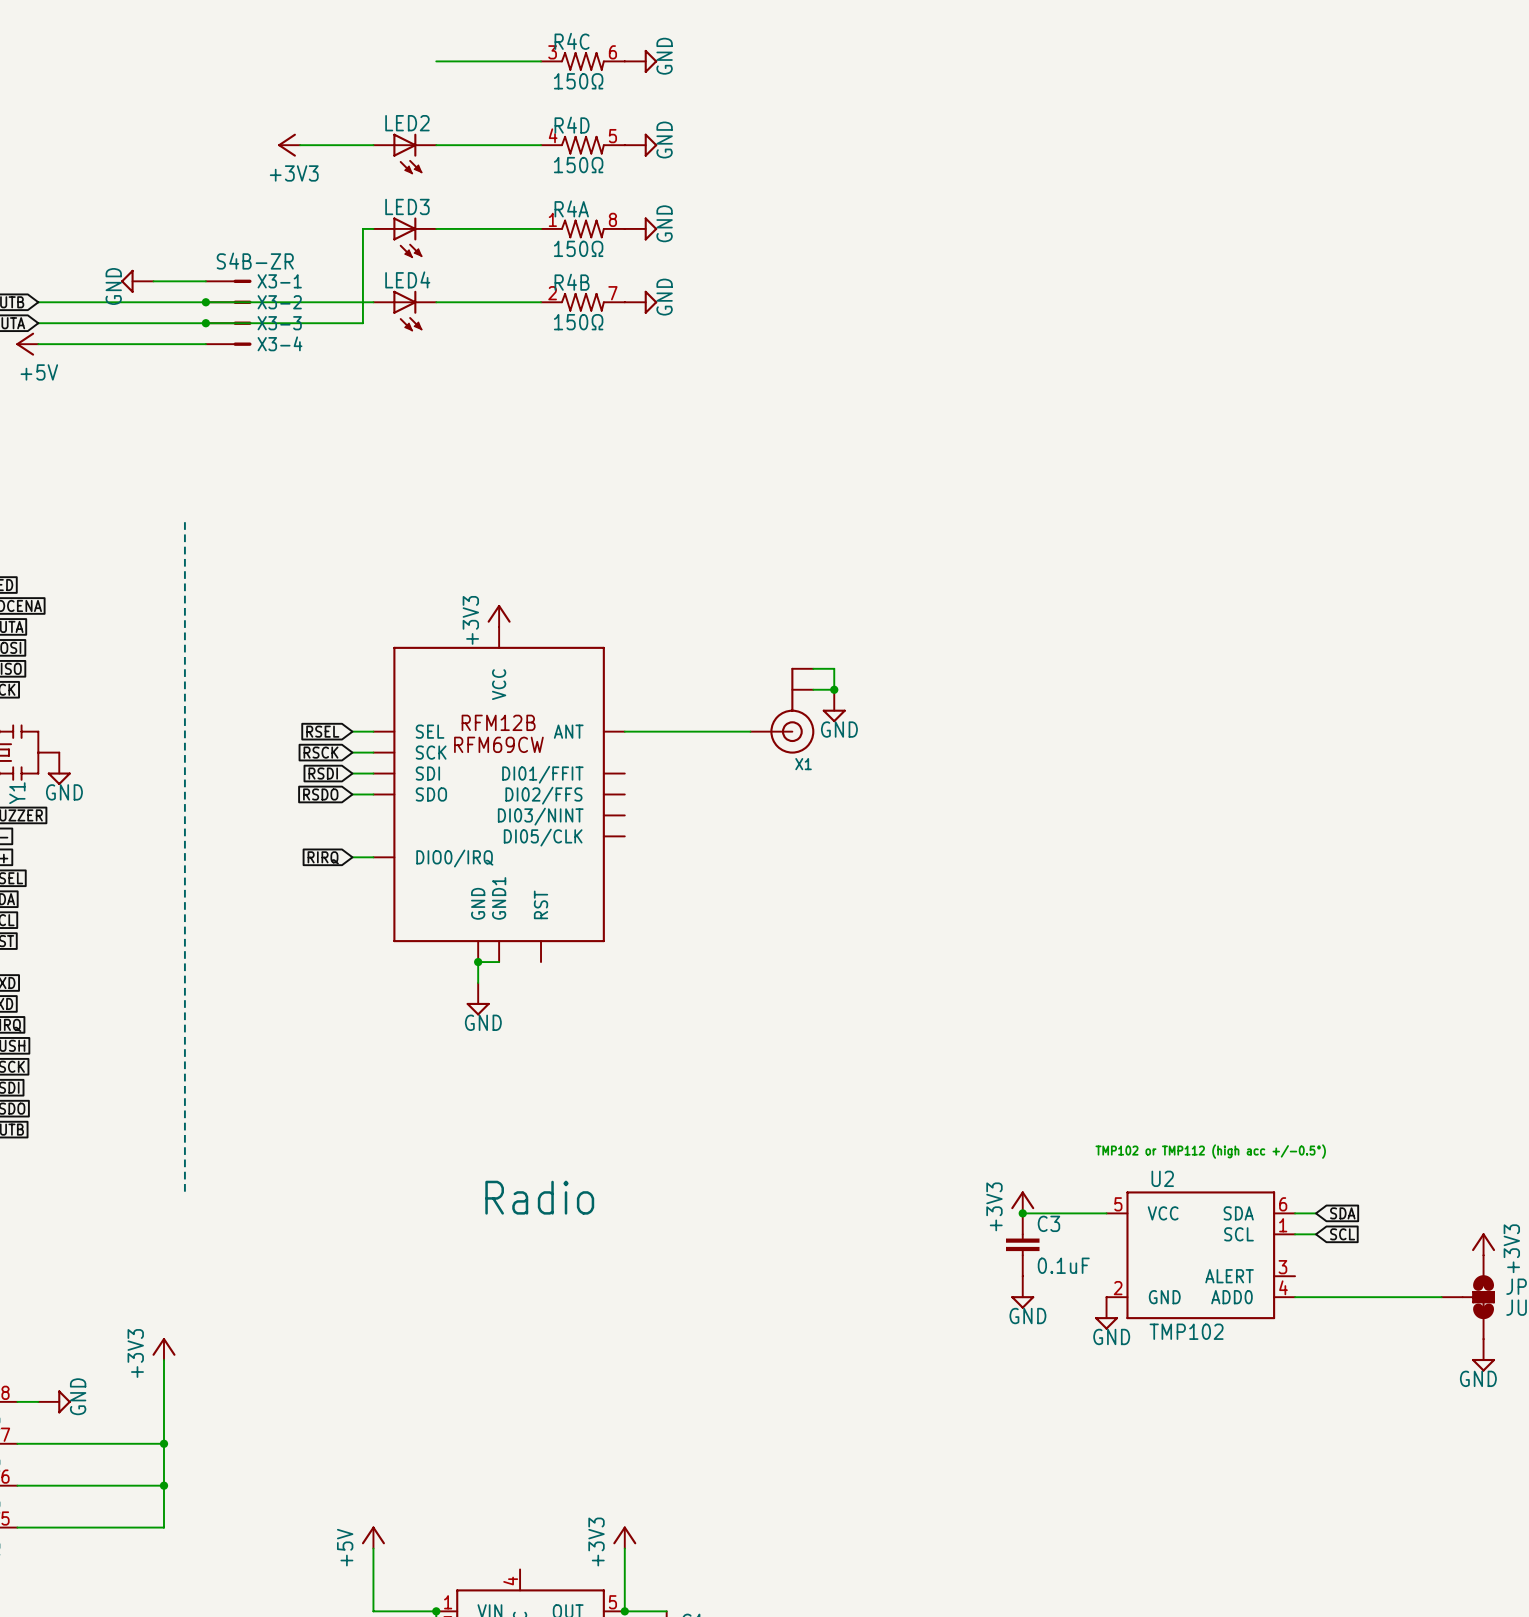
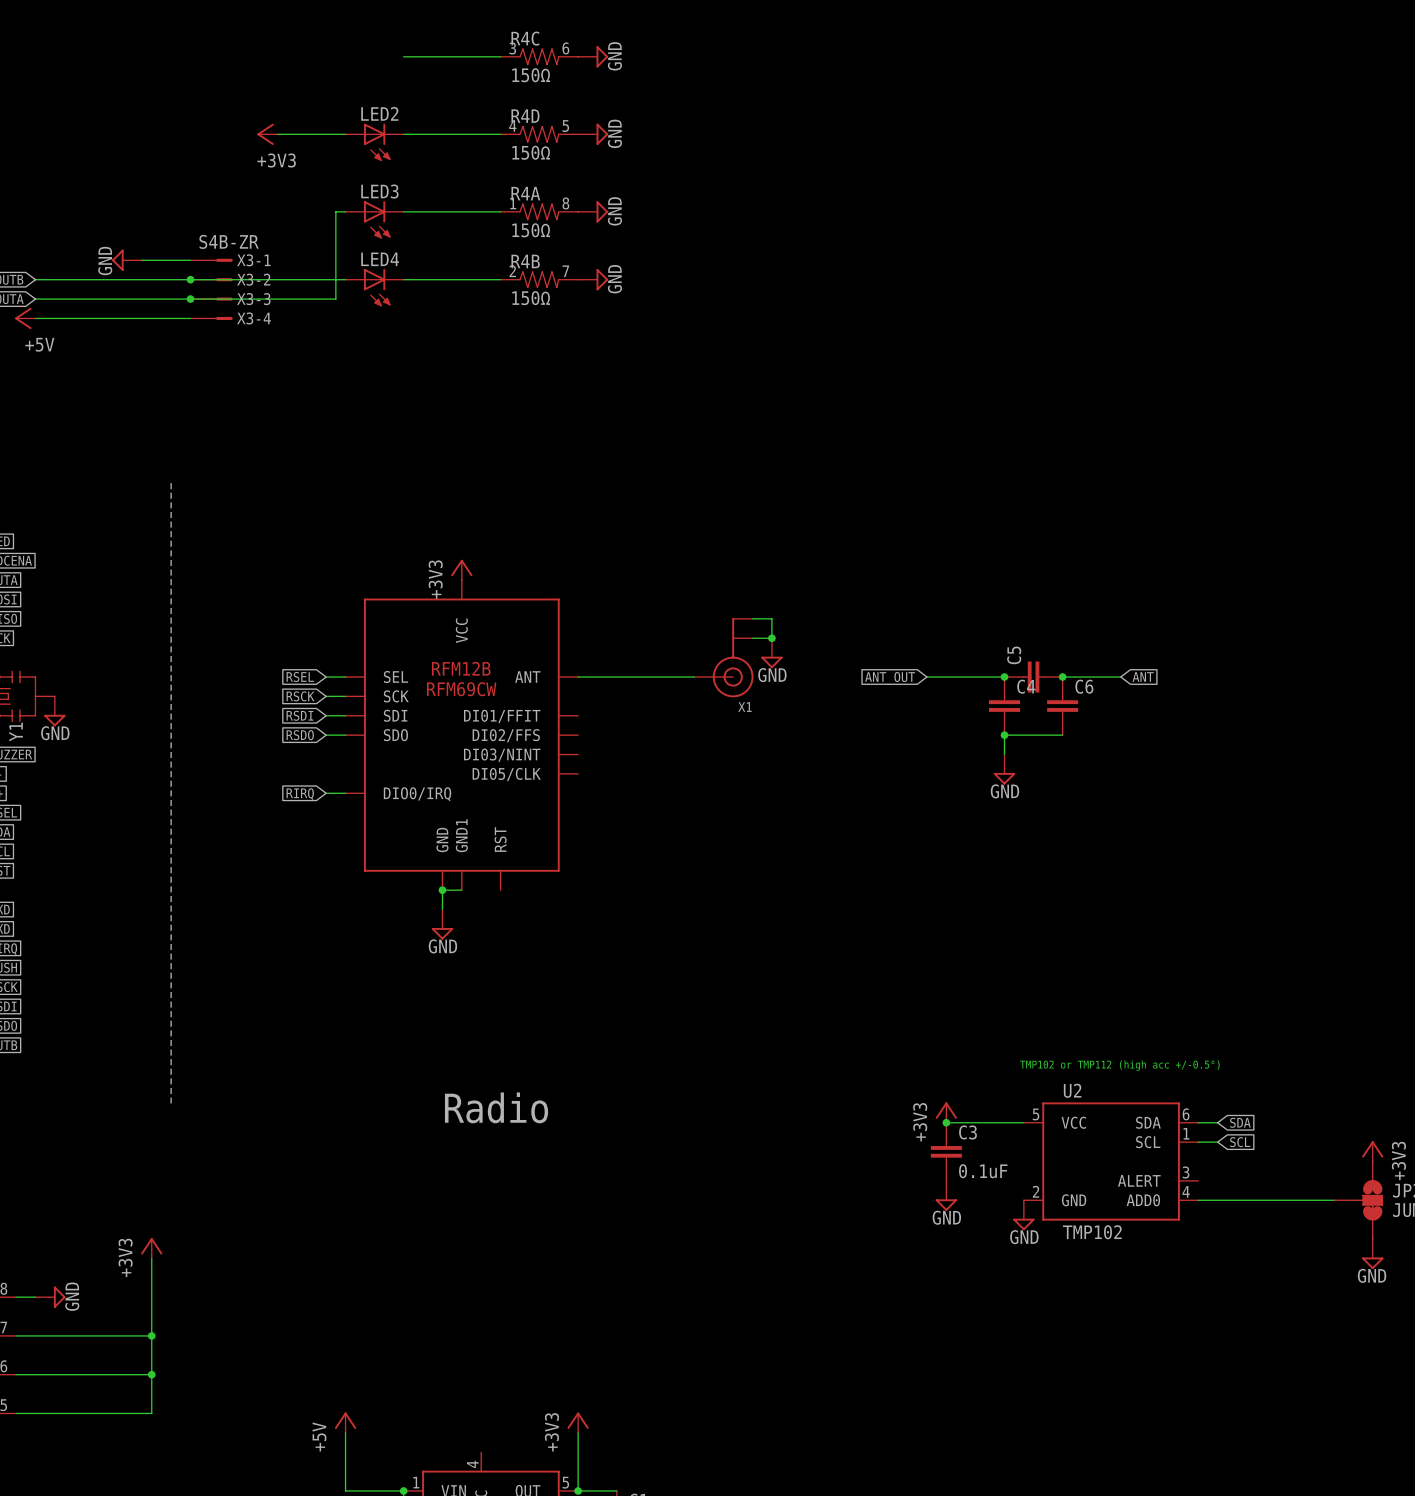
wire: none -> (926, 676) (1004, 676)
junction: none -> (1004, 676)
C5: none -> (1033, 676)
wire: none -> (1062, 676) (1120, 676)
junction: none -> (1062, 676)
global label: none -> ANT (1143, 676)
global label: none -> ANT_OUT (890, 678)
C4: none -> (1004, 706)
C6: none -> (1062, 706)
junction: none -> (1004, 735)
wire: none -> (1062, 735) (1004, 735) (1004, 754)
power symbol: none -> GND (1004, 769)

